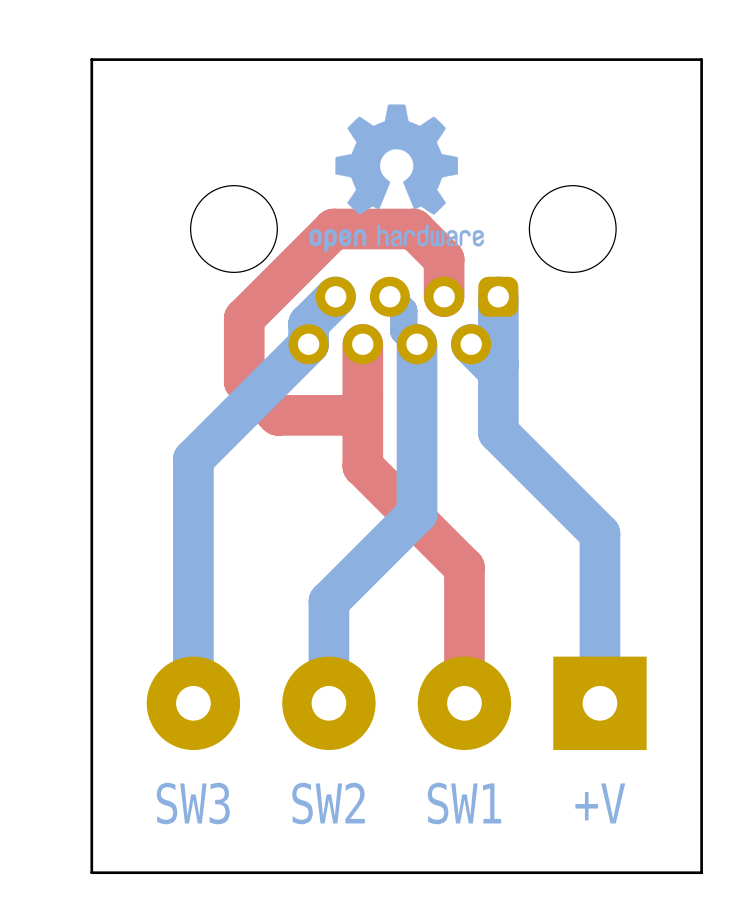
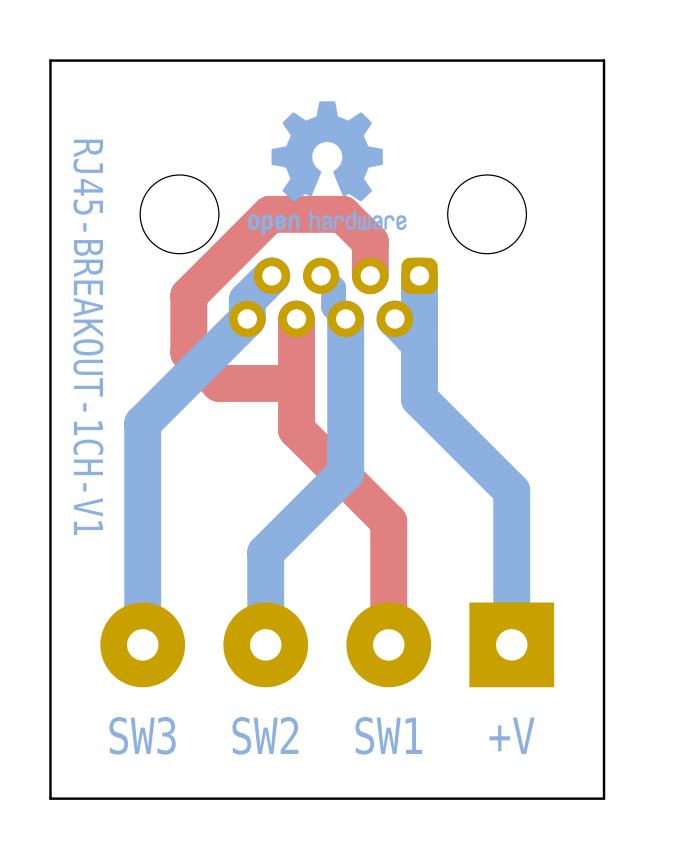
text: none -> RJ45-BREAKOUT-1CH-V1 (88, 337)

